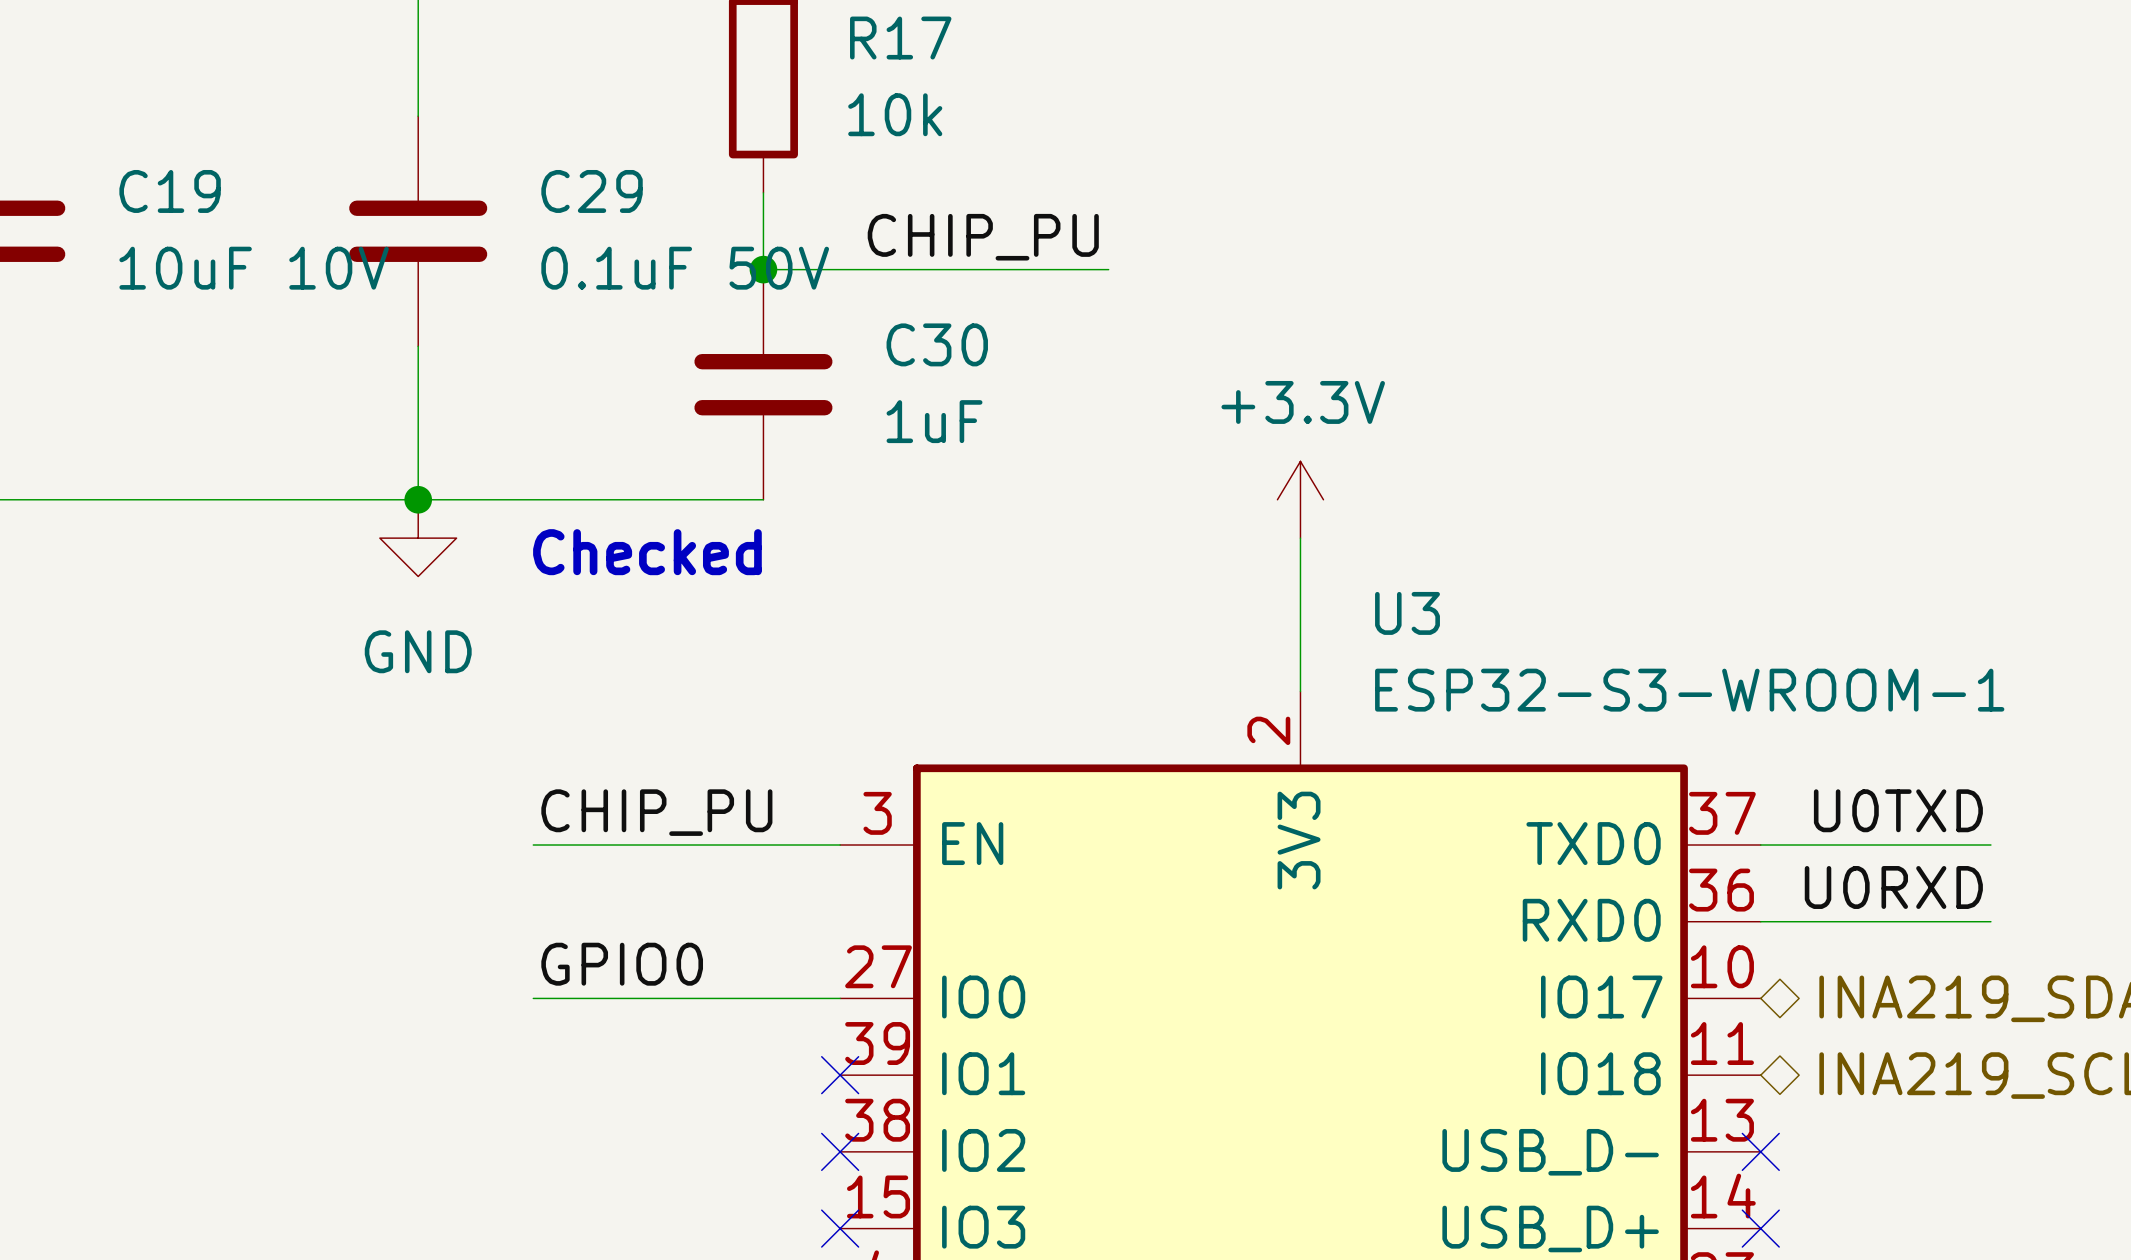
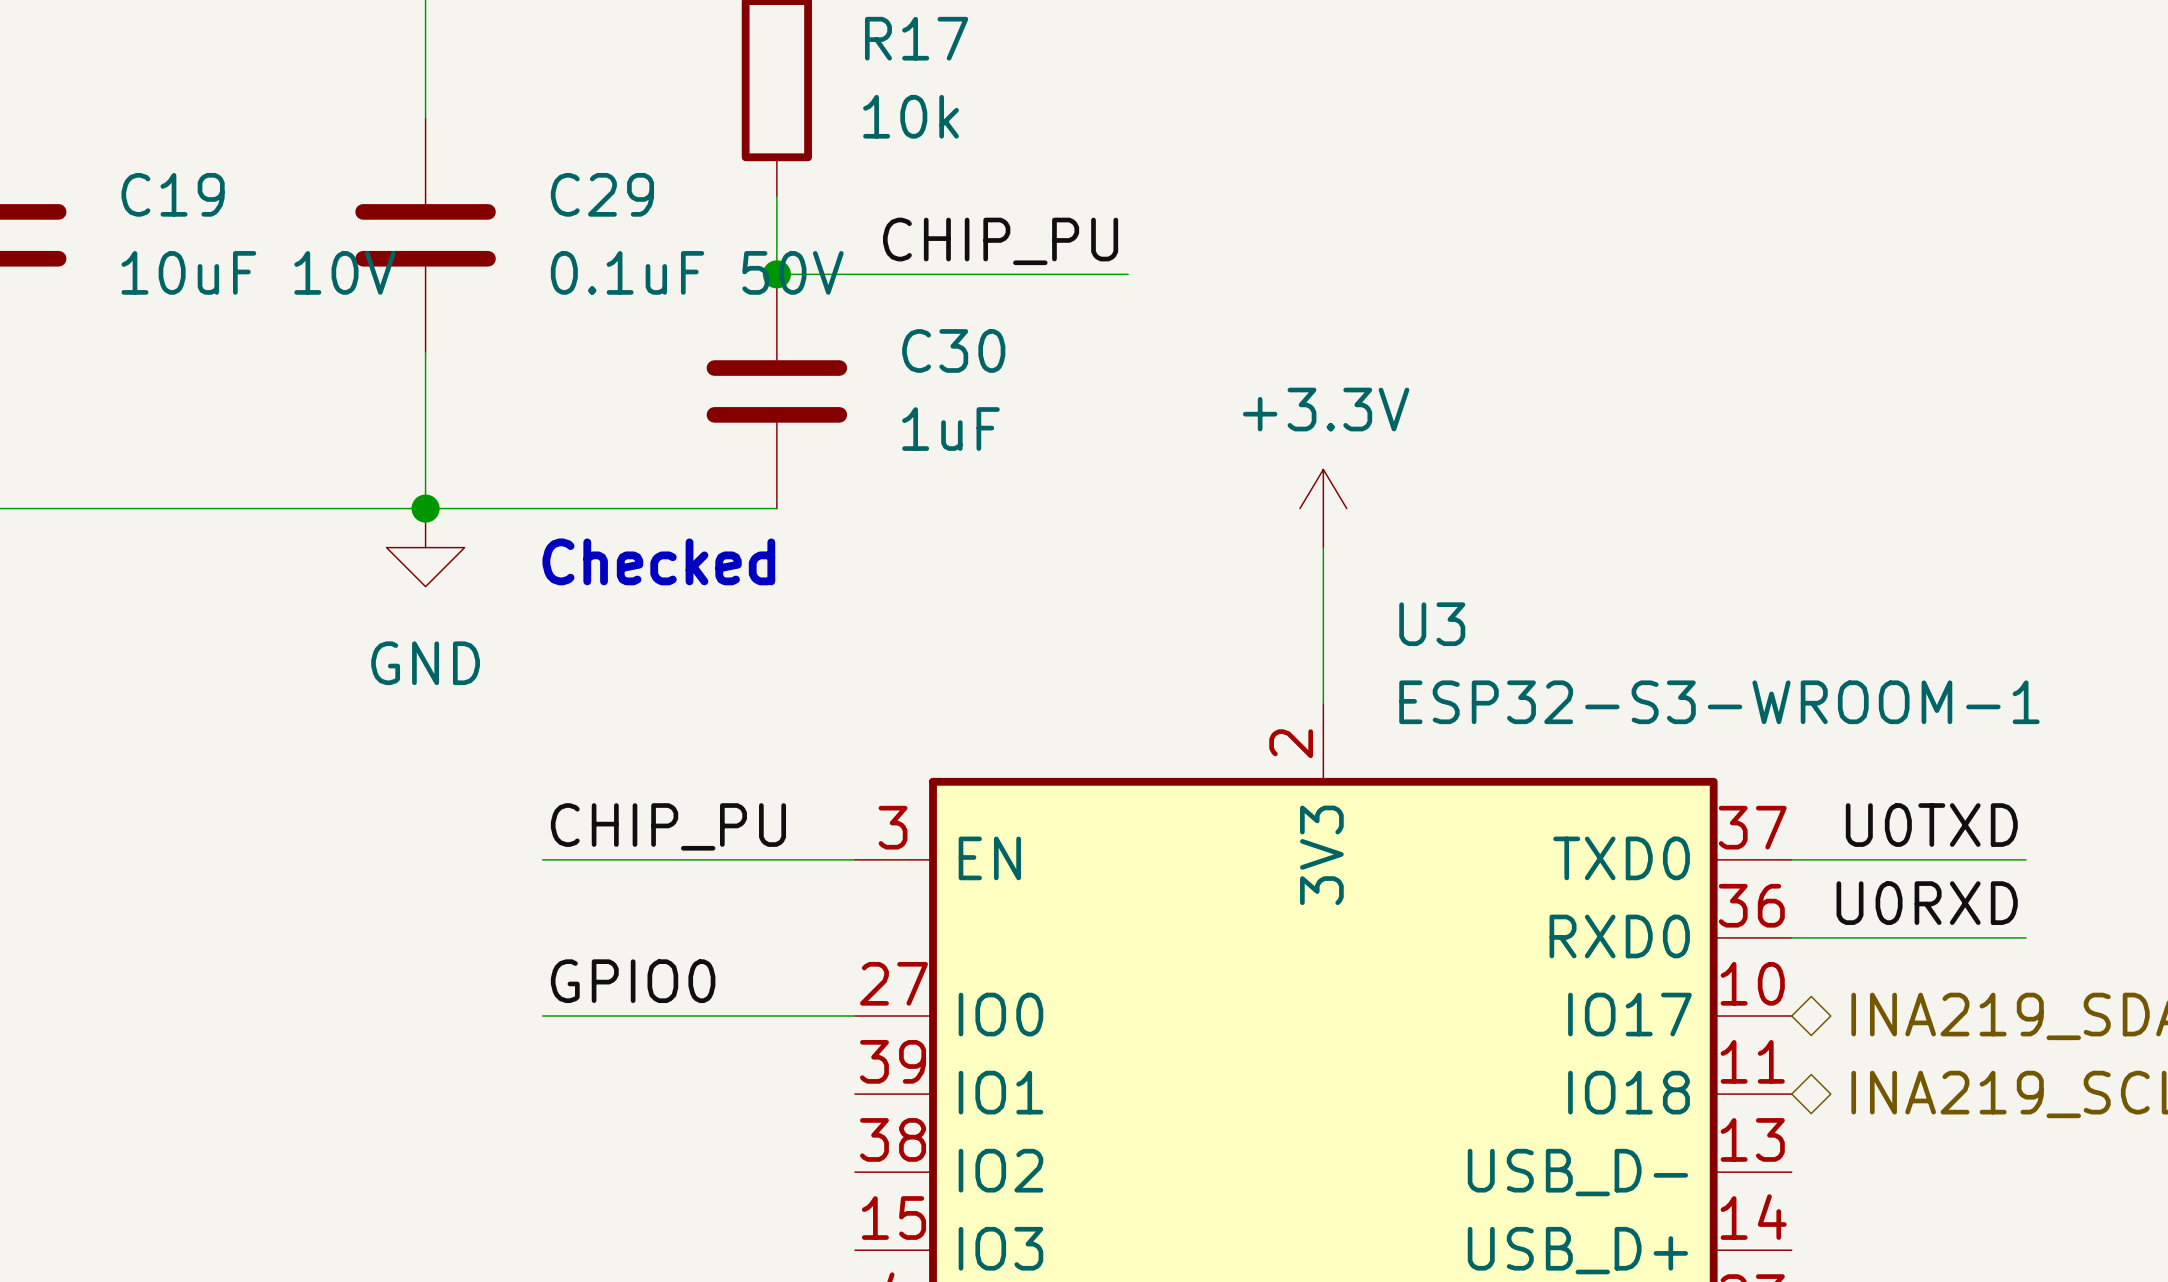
no-connect mark: (840, 1075) -> none
no-connect mark: (840, 1151) -> none
no-connect mark: (1760, 1151) -> none
no-connect mark: (840, 1228) -> none
no-connect mark: (1760, 1228) -> none

